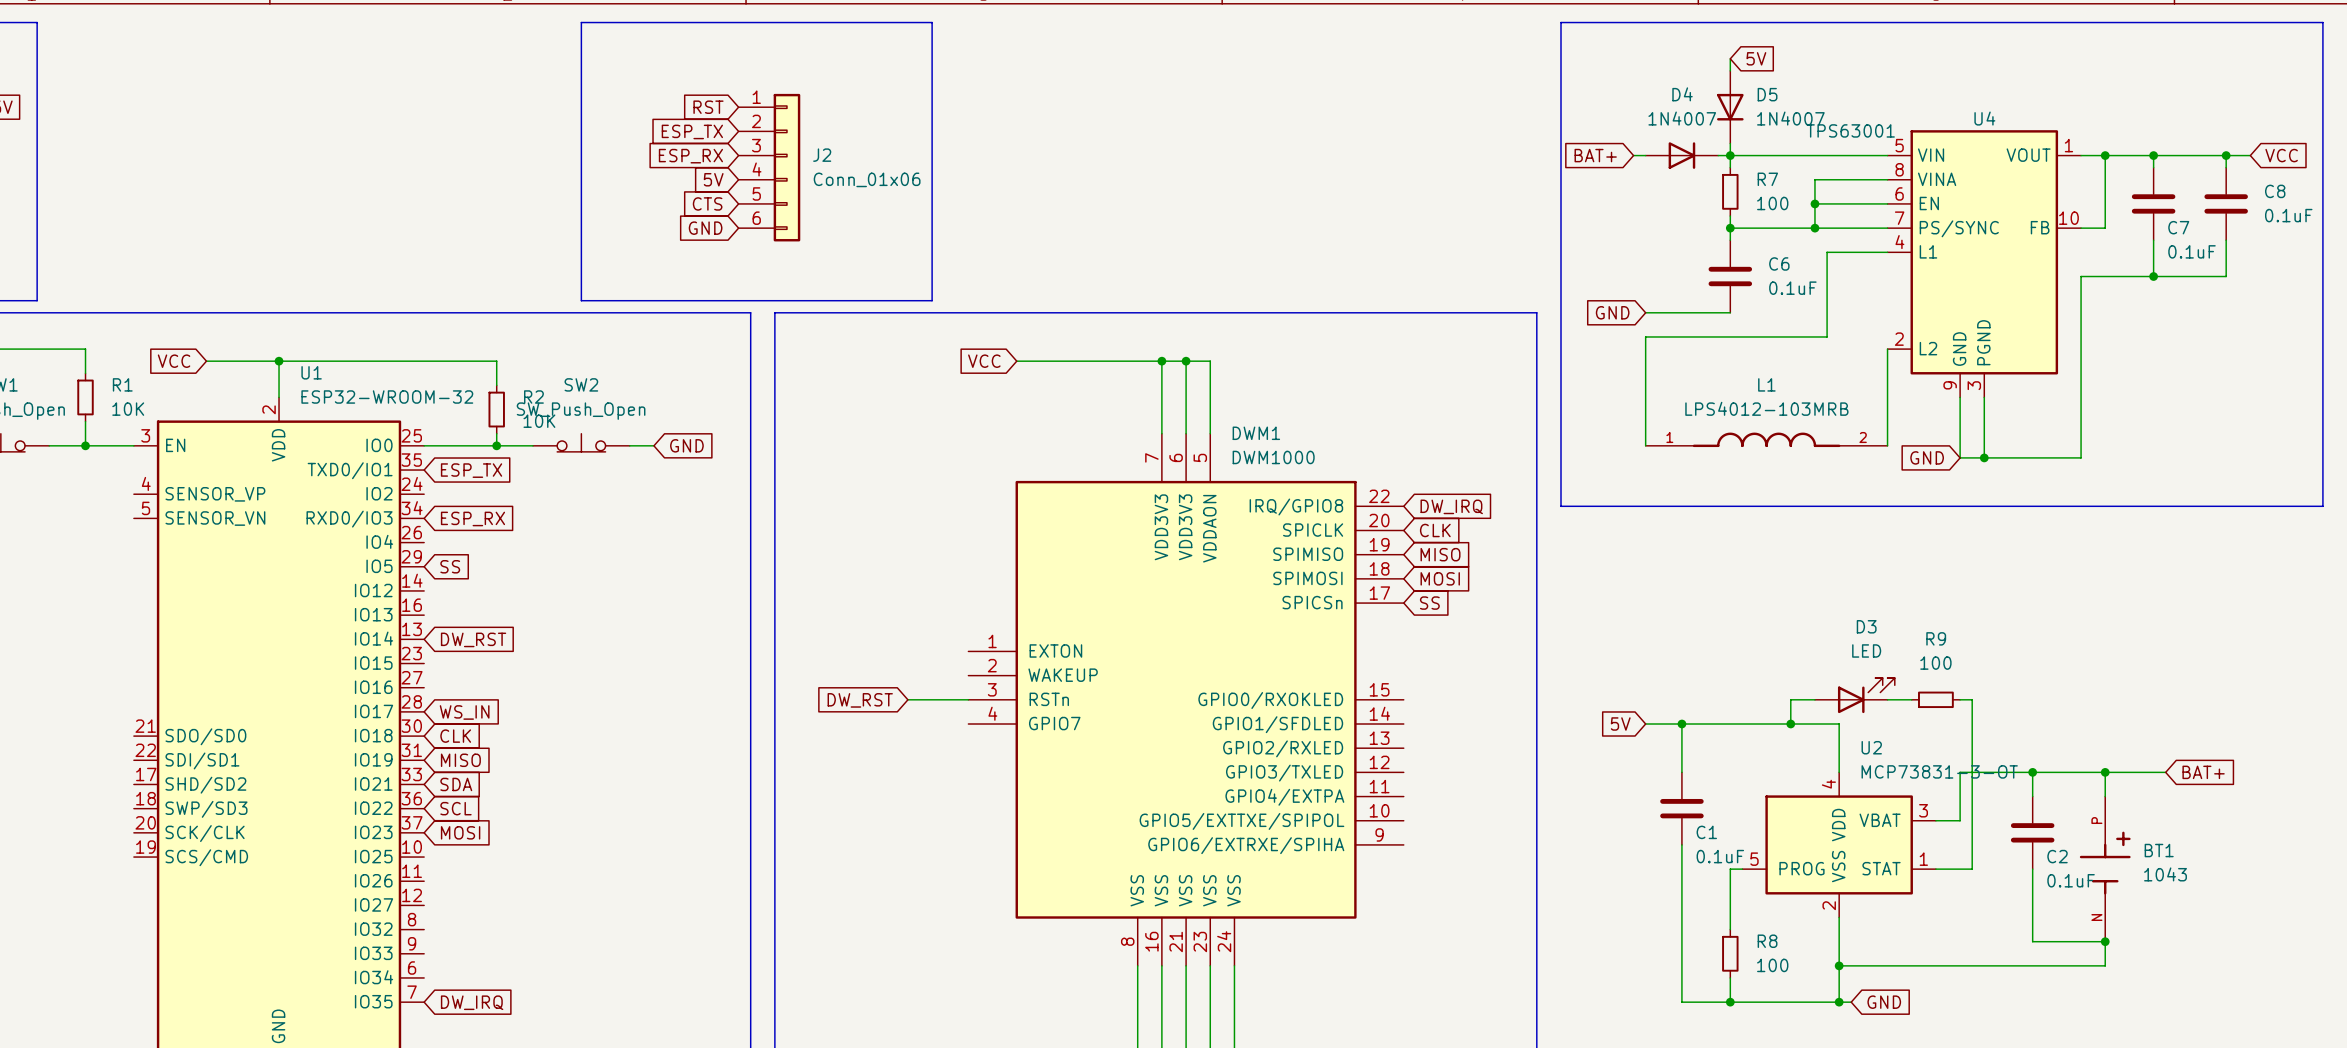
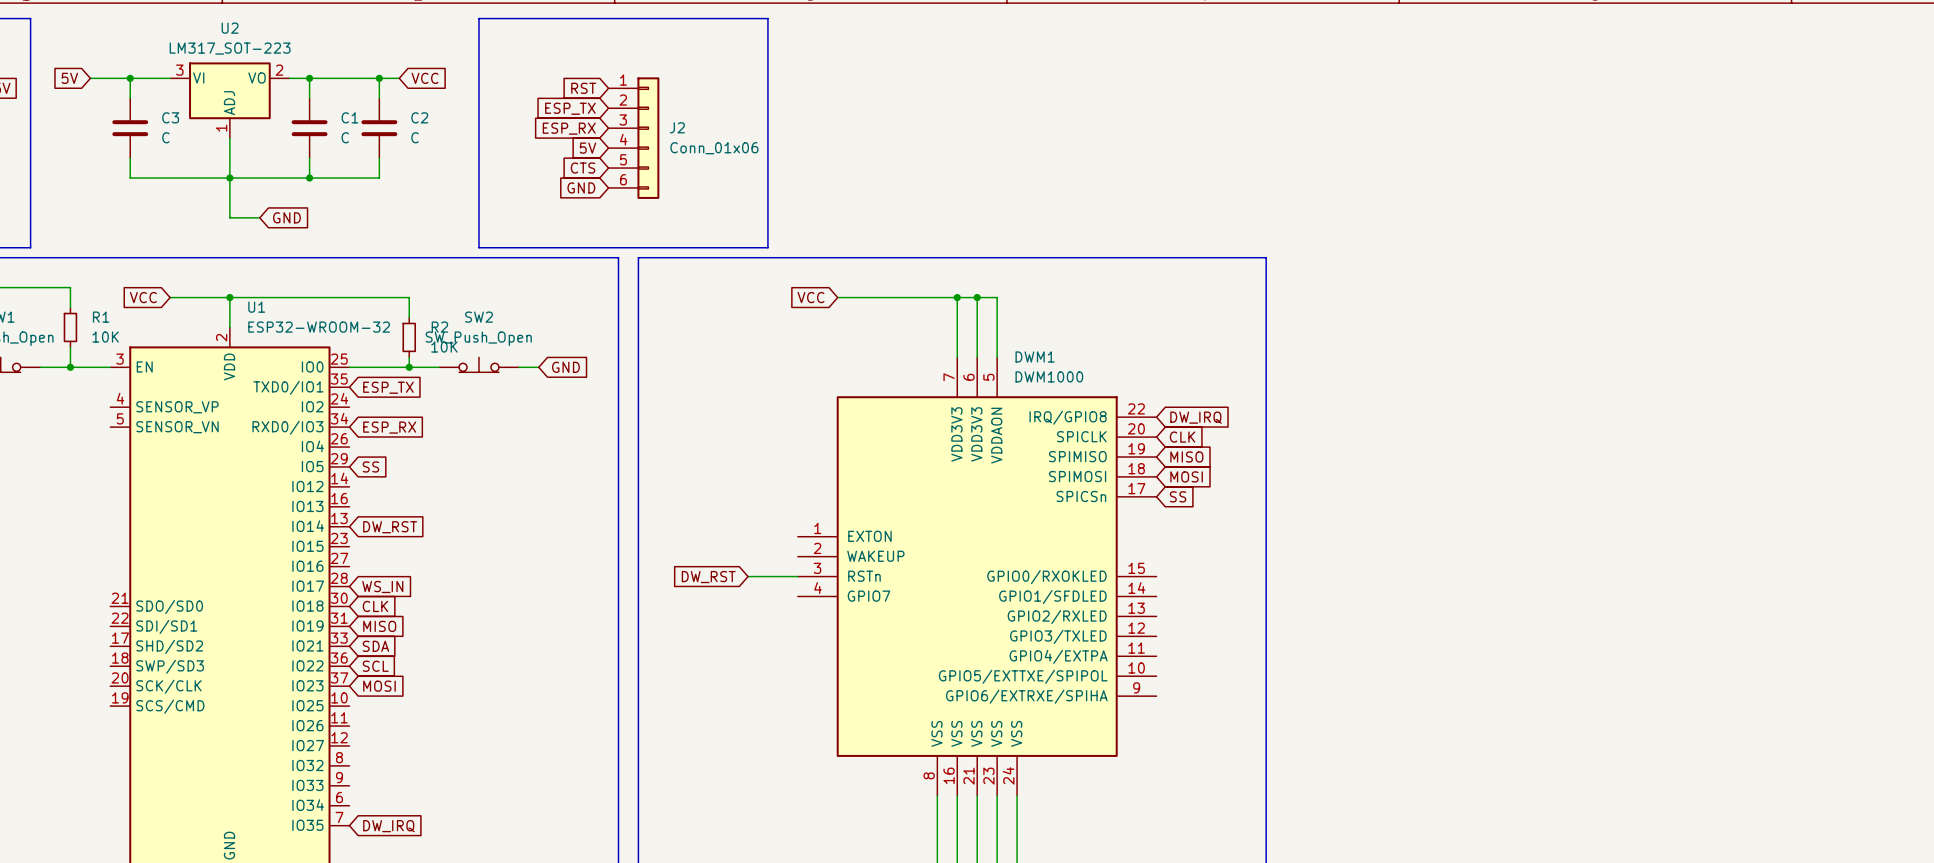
line: (1561, 22) (1561, 506) (2322, 506) (2322, 22) (1561, 22) -> none
wire: (1730, 58) (1730, 70) -> none
global label: 5V (1756, 58) -> none
global label: none -> 5V (69, 78)
wire: none -> (90, 78) (170, 78)
wire: none -> (130, 78) (130, 98)
junction: none -> (130, 78)
wire: none -> (289, 78) (399, 78)
wire: none -> (309, 78) (309, 98)
junction: none -> (309, 78)
wire: none -> (379, 78) (379, 98)
junction: none -> (379, 78)
global label: none -> VCC (425, 78)
D5: 1N4007 (1730, 107) -> none
wire: (1730, 143) (1730, 167) -> none
C3: none -> C (130, 128)
global label: BAT+ (1595, 155) -> none
wire: (1633, 155) (1645, 155) -> none
D4: 1N4007 (1681, 155) -> none
wire: (1718, 155) (1887, 155) -> none
junction: (1730, 155) -> none
wire: (2081, 155) (2250, 155) -> none
wire: (2105, 155) (2105, 228) (2081, 228) -> none
junction: (2105, 155) -> none
wire: (2153, 155) (2153, 167) -> none
junction: (2153, 155) -> none
wire: (2226, 155) (2226, 167) -> none
junction: (2226, 155) -> none
global label: VCC (2281, 155) -> none
wire: none -> (229, 138) (229, 217) (259, 217)
wire: (1887, 179) (1814, 179) (1814, 228) -> none
wire: none -> (130, 158) (130, 178) (379, 178) (379, 158)
wire: none -> (309, 158) (309, 178)
R7: 100 (1730, 191) -> none
wire: (1814, 203) (1887, 203) -> none
junction: (1814, 203) -> none
C7: 0.1uF (2153, 203) -> none
C8: 0.1uF (2226, 203) -> none
junction: none -> (229, 178)
junction: none -> (309, 178)
wire: (1730, 216) (1730, 240) -> none
wire: (1730, 228) (1887, 228) -> none
junction: (1730, 228) -> none
junction: (1814, 228) -> none
wire: (2153, 240) (2153, 276) -> none
wire: (2226, 240) (2226, 276) (2081, 276) (2081, 457) (1960, 457) (1960, 397) -> none
wire: (1887, 252) (1827, 252) (1827, 336) (1645, 336) (1645, 445) -> none
U4: TPS63001 (1984, 263) -> none
global label: none -> GND (286, 217)
C6: 0.1uF (1730, 276) -> none
junction: (2153, 276) -> none
global label: GND (1612, 312) -> none
wire: (1645, 312) (1730, 312) -> none
wire: (1887, 349) (1887, 445) -> none
wire: (1984, 397) (1984, 457) -> none
L1: LPS4012-103MRB (1766, 439) -> none
global label: GND (1927, 457) -> none
junction: (1984, 457) -> none
D3: LED (1854, 695) -> none
wire: (1814, 699) (1790, 699) (1790, 724) -> none
wire: (1887, 699) (1911, 699) -> none
R9: 100 (1935, 699) -> none
wire: (1960, 699) (1972, 699) (1972, 869) (1935, 869) -> none
global label: 5V (1620, 724) -> none
wire: (1645, 724) (1839, 724) (1839, 772) -> none
wire: (1681, 724) (1681, 772) -> none
junction: (1681, 724) -> none
junction: (1790, 724) -> none
U2 name position: U2 (1871, 747) -> U2 (230, 28)
U2 value: MCP73831-3-OT (1939, 771) -> LM317_SOT-223 (230, 48)
U2 symbol: [1742, 772, 1936, 918] -> [170, 62, 290, 139]
wire: (2032, 772) (2032, 796) -> none
junction: (2032, 772) -> none
wire: (2105, 772) (2105, 796) -> none
junction: (2105, 772) -> none
wire: (2165, 772) (1960, 772) (1960, 820) (1935, 820) -> none
global label: BAT+ (2203, 772) -> none
C1 position: (1681, 808) -> (309, 128)
C1 name position: C1 (1706, 832) -> C1 (350, 117)
C2 position: (2032, 832) -> (379, 128)
wire: (1681, 844) (1681, 1002) (1851, 1002) -> none
C1 value: 0.1uF (1720, 856) -> C (345, 137)
C2 name position: C2 (2057, 856) -> C2 (419, 117)
wire: (1742, 869) (1730, 869) (1730, 929) -> none
wire: (2032, 869) (2032, 941) (2105, 941) (2105, 965) (1839, 965) -> none
BT1: 1043 (2105, 869) -> none
C2 value: 0.1uF (2071, 880) -> C (415, 137)
wire: (1839, 917) (1839, 1002) -> none
junction: (2105, 941) -> none
R8: 100 (1730, 953) -> none
junction: (1839, 965) -> none
wire: (1730, 977) (1730, 1002) -> none
junction: (1730, 1002) -> none
junction: (1839, 1002) -> none
global label: GND (1884, 1002) -> none

